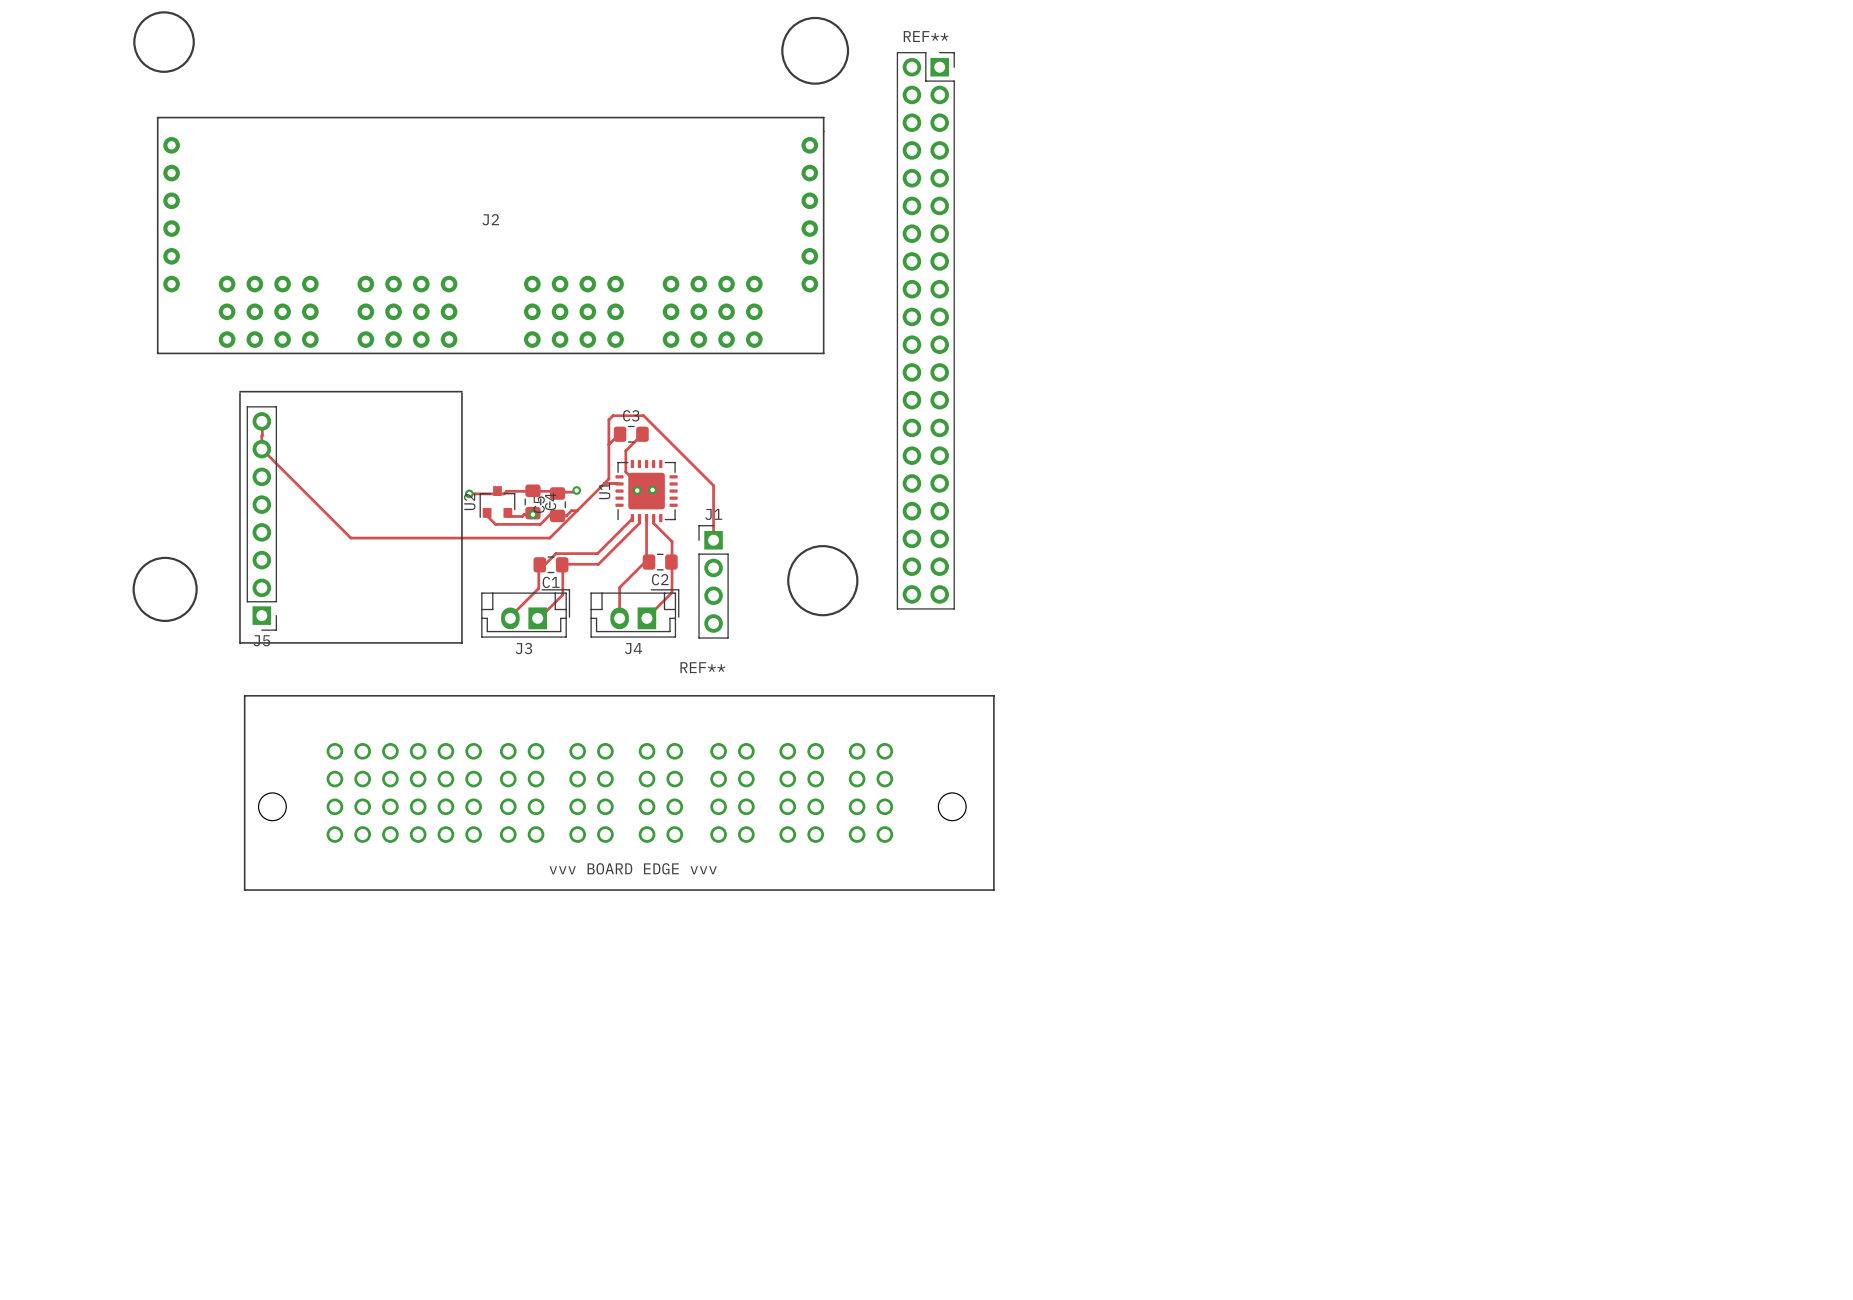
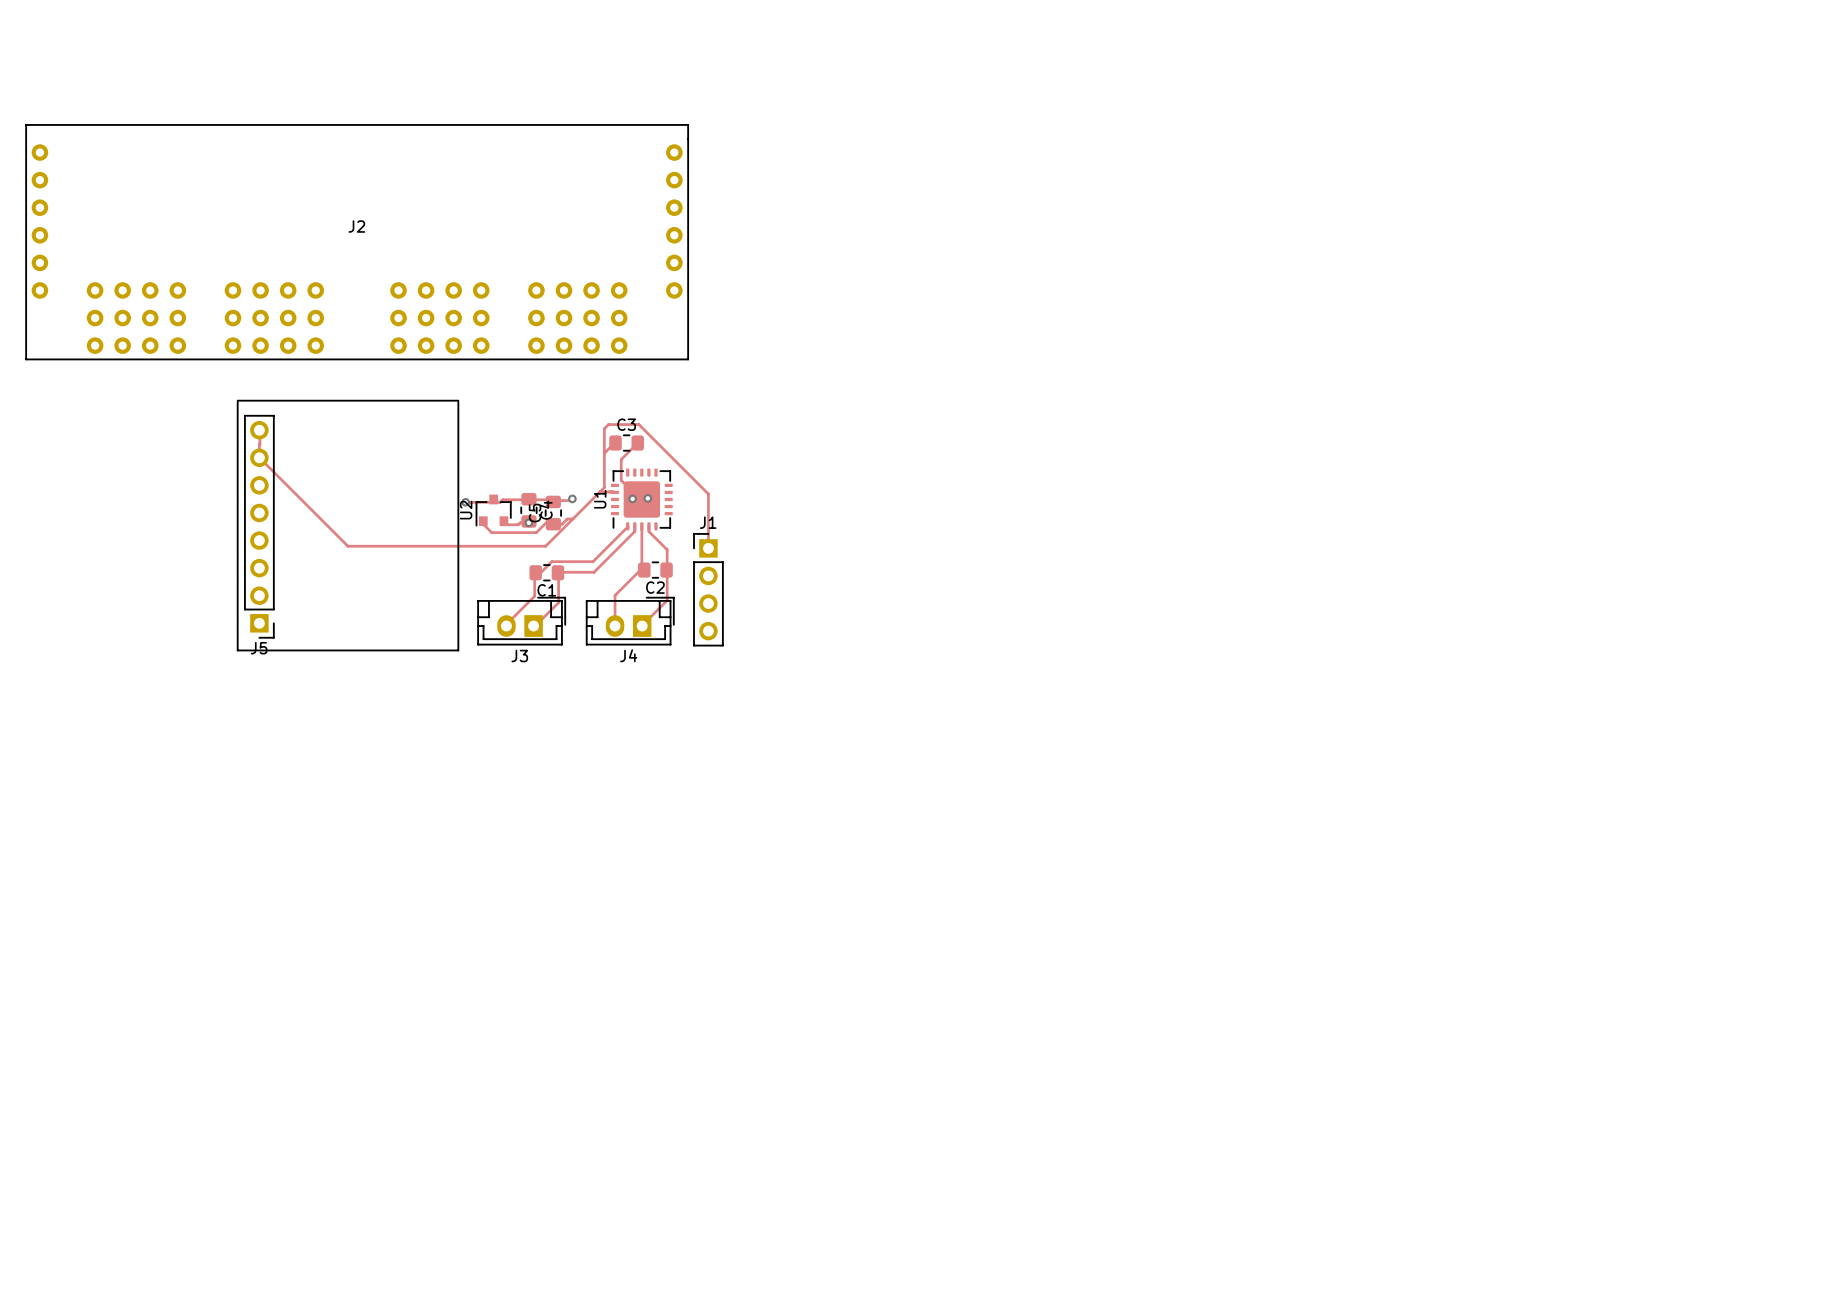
drawing: [133, 11, 195, 73] -> none
drawing: [781, 16, 850, 85] -> none
J2 position: (490, 235) -> (357, 242)
REF**: (925, 330) -> none
drawing: [787, 545, 859, 617] -> none
drawing: [132, 556, 198, 623] -> none
REF**: (619, 792) -> none

